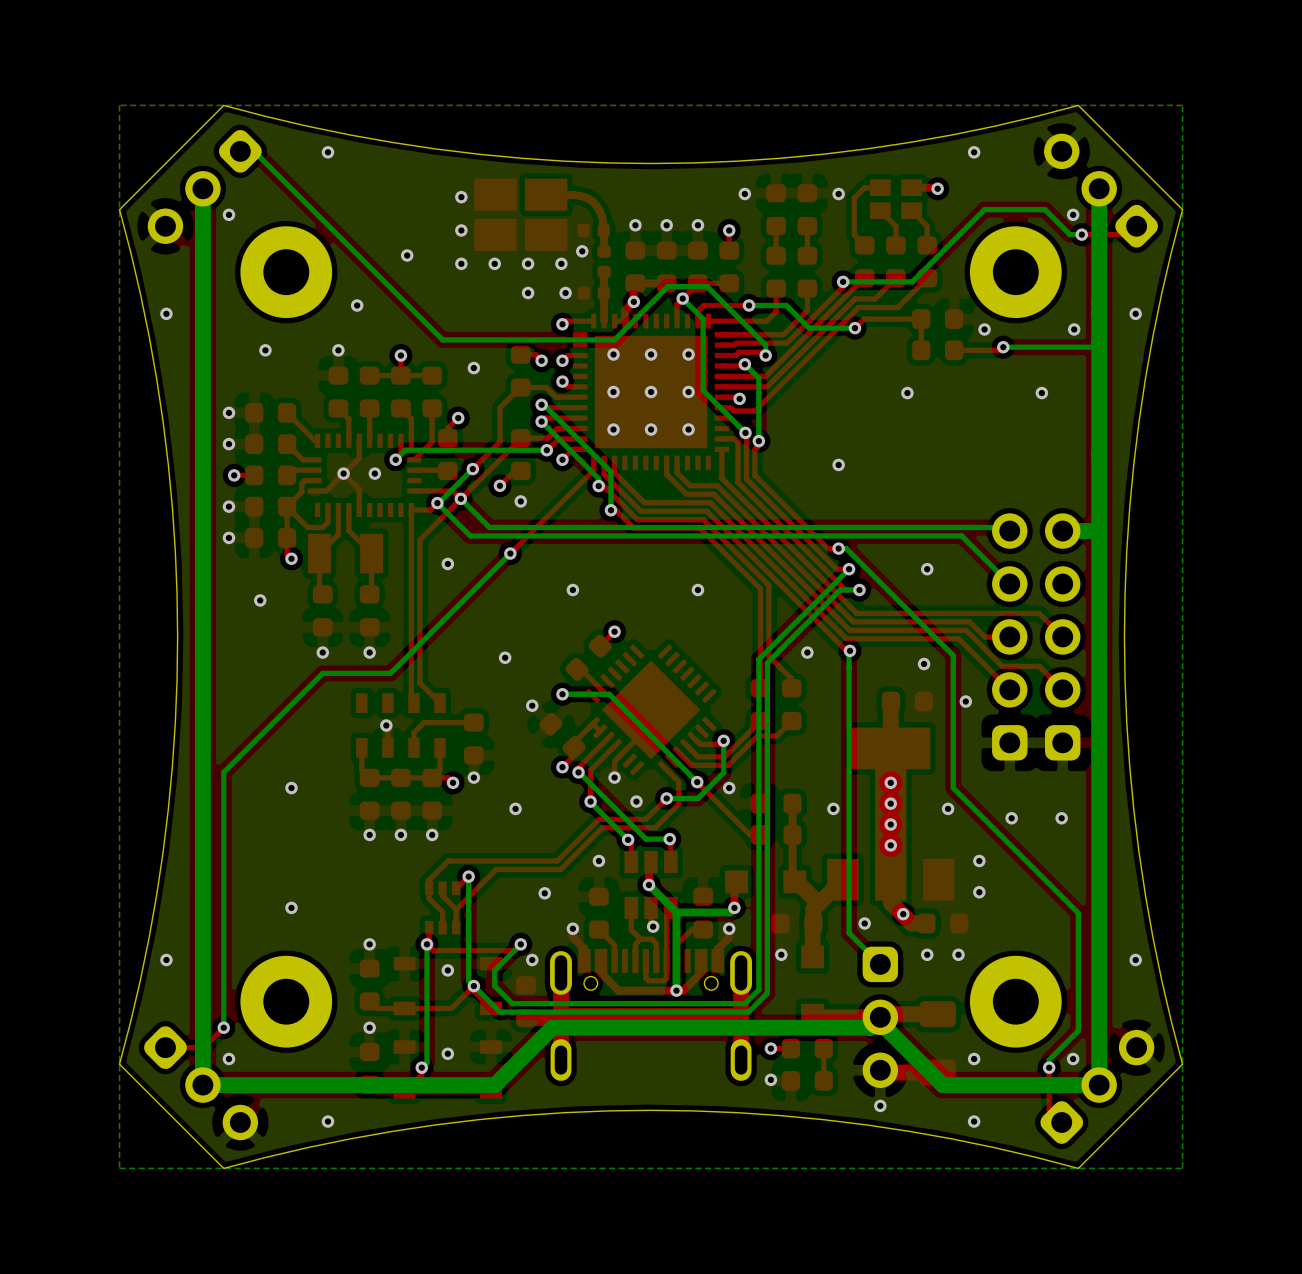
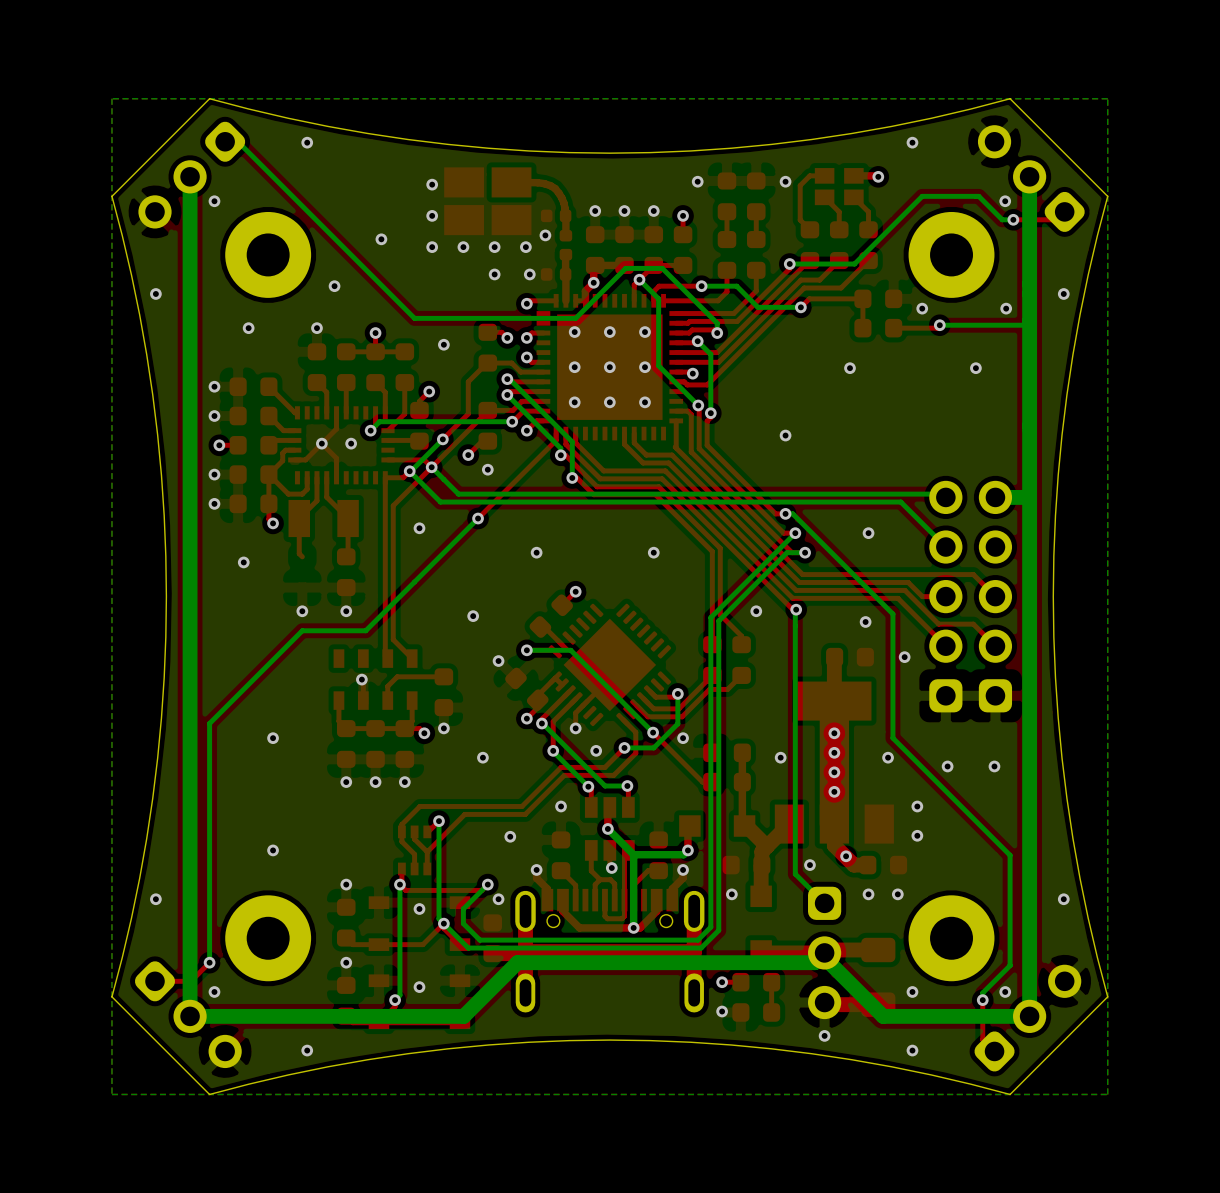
part: (322, 610) -> none

